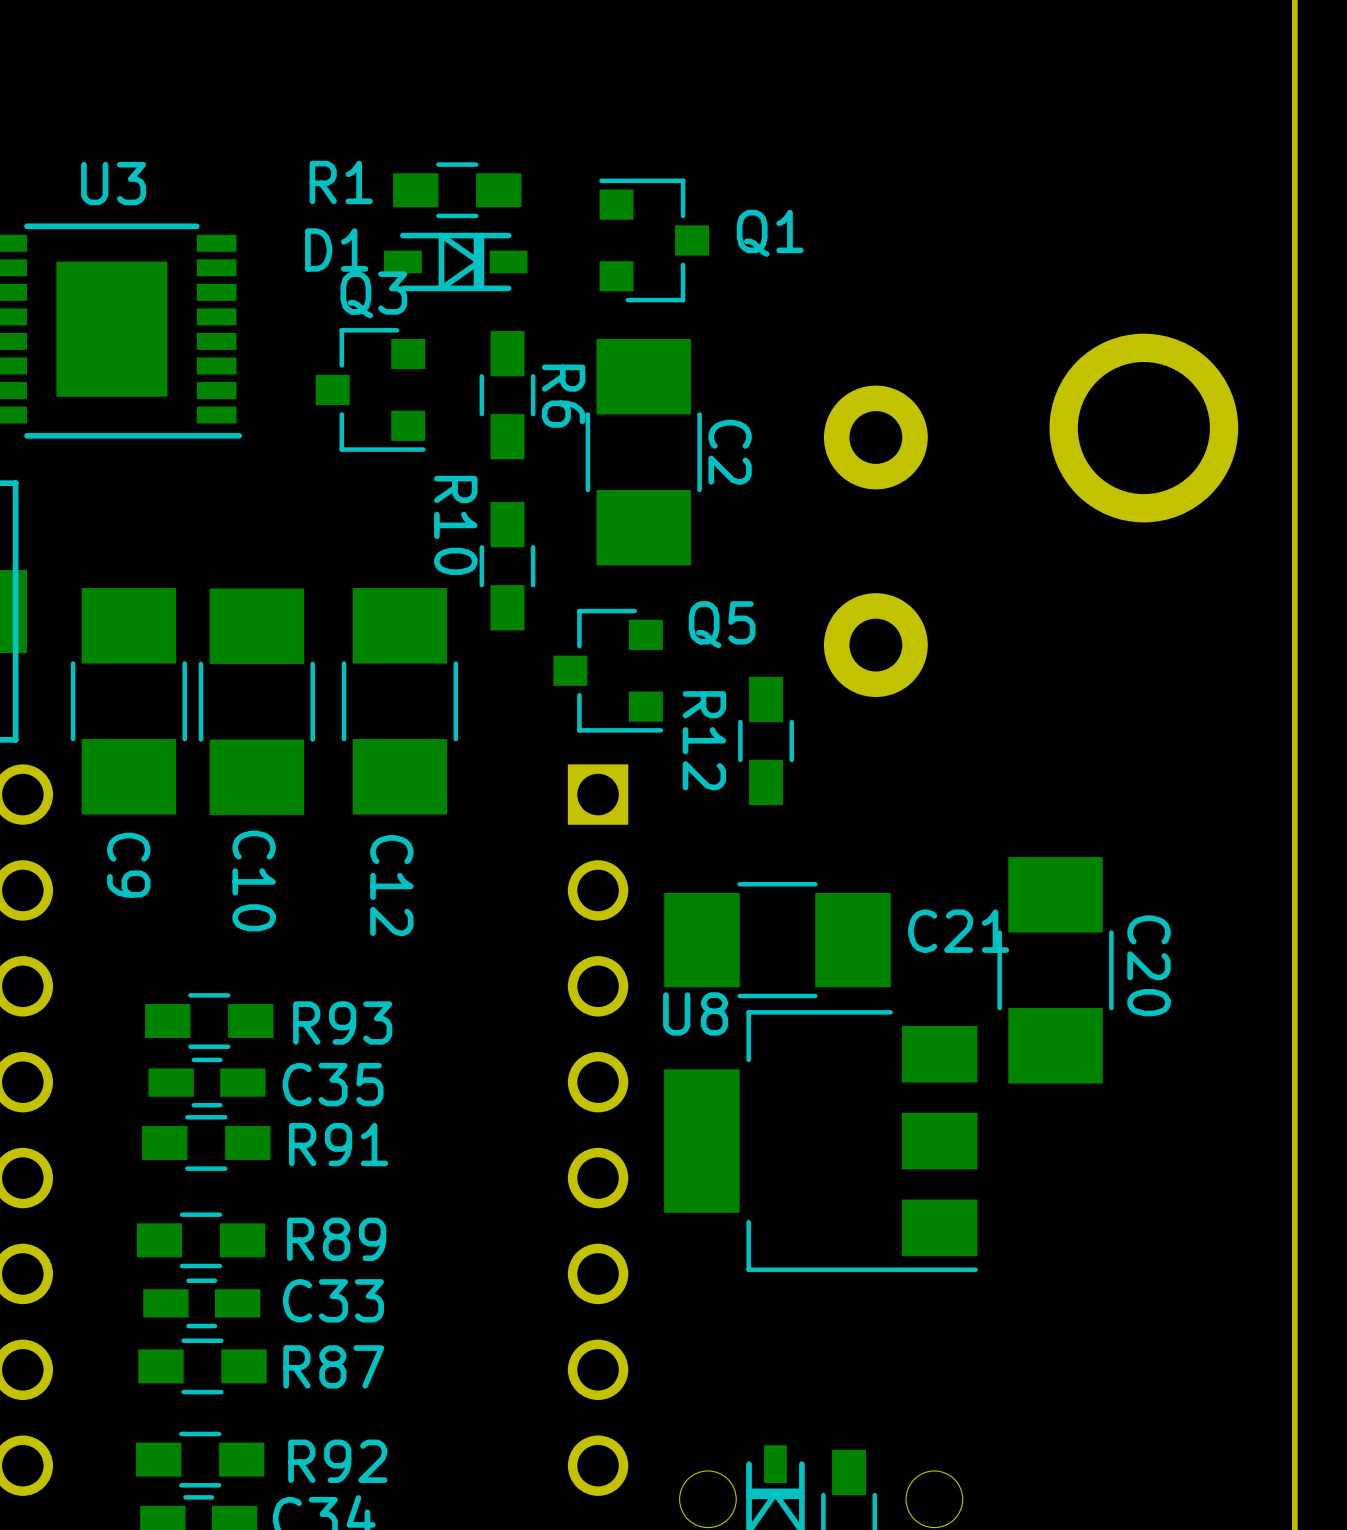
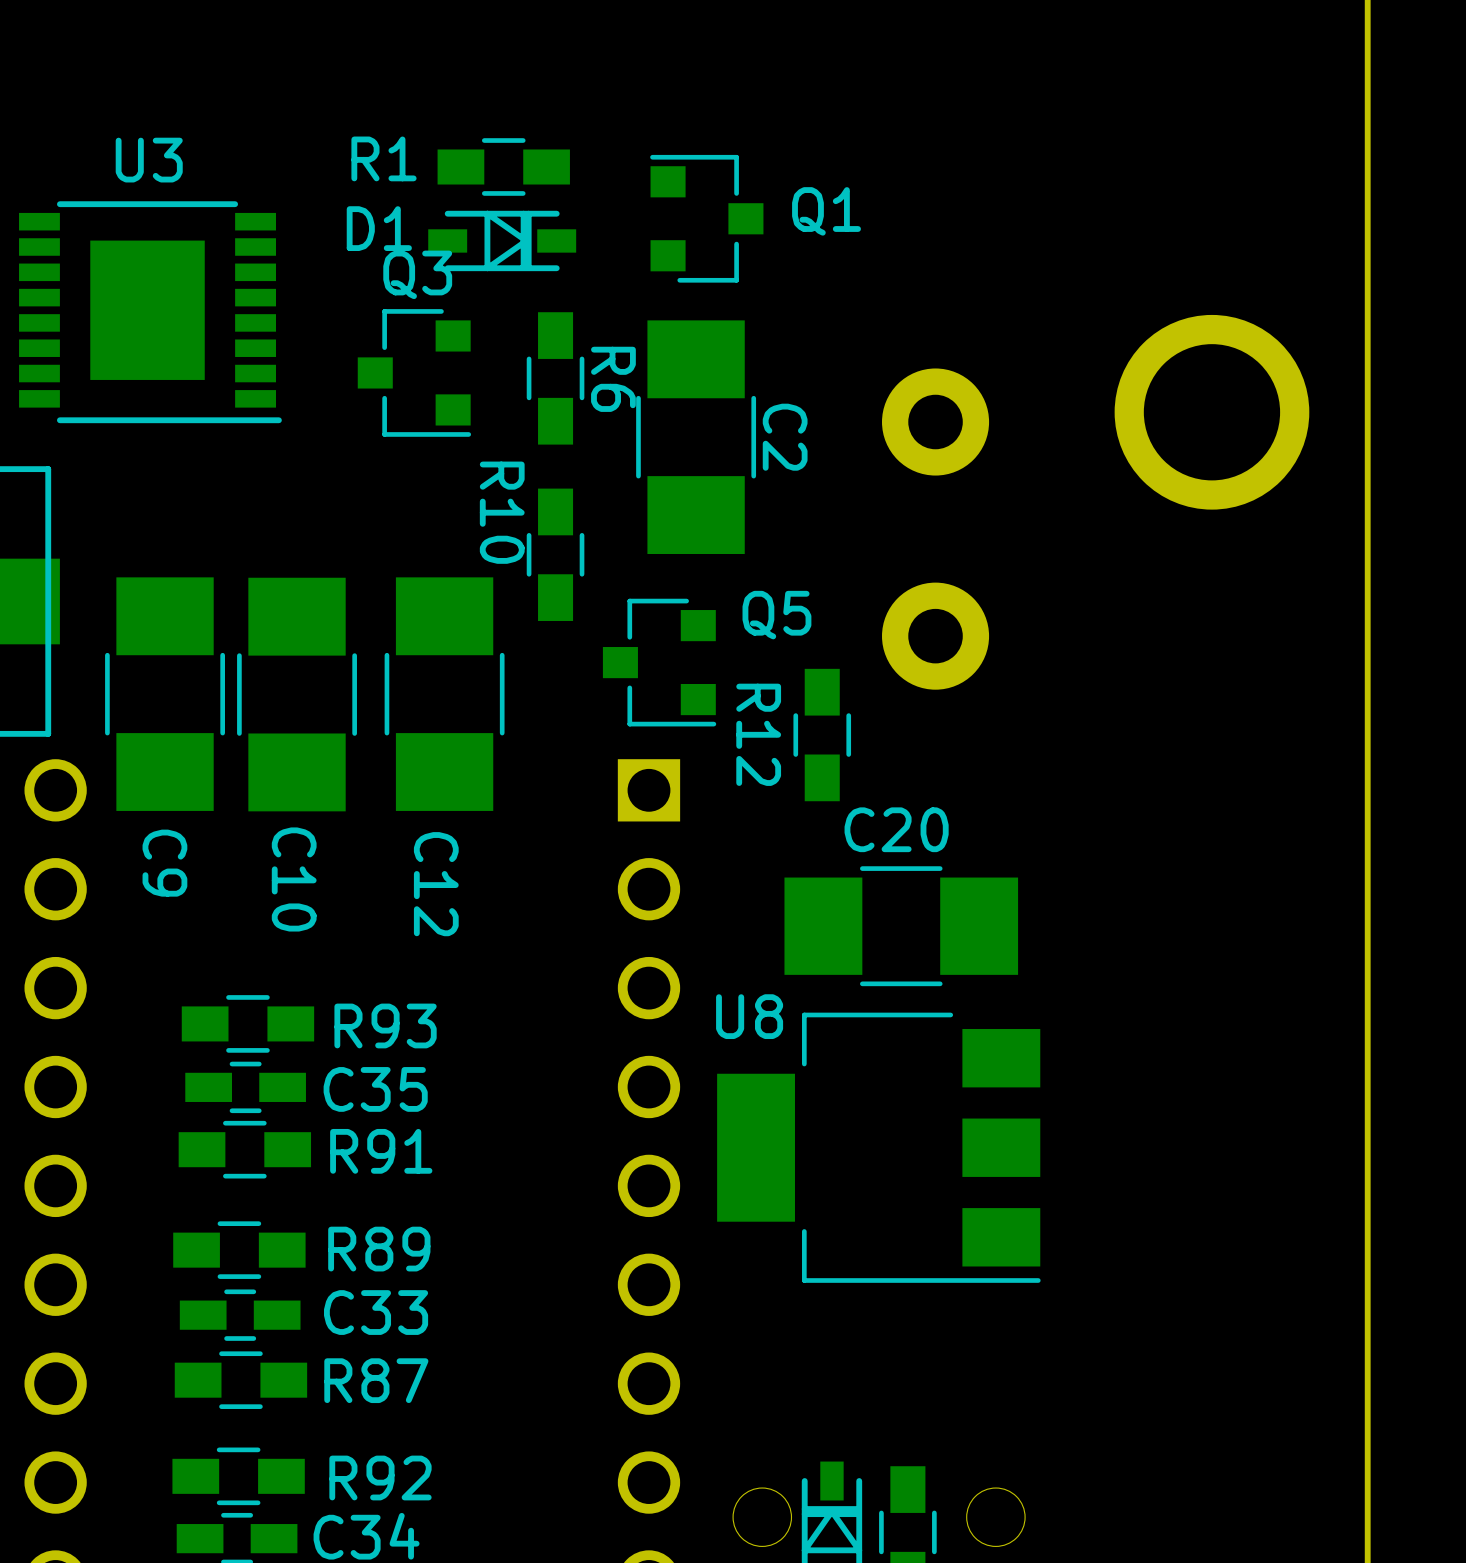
C21: (777, 940) -> none
C20 name position: C20 (1149, 965) -> C20 (896, 829)
C20 rotation: 0° (1055, 970) -> 90° clockwise (901, 926)
C20 position: (1055, 970) -> (901, 926)

